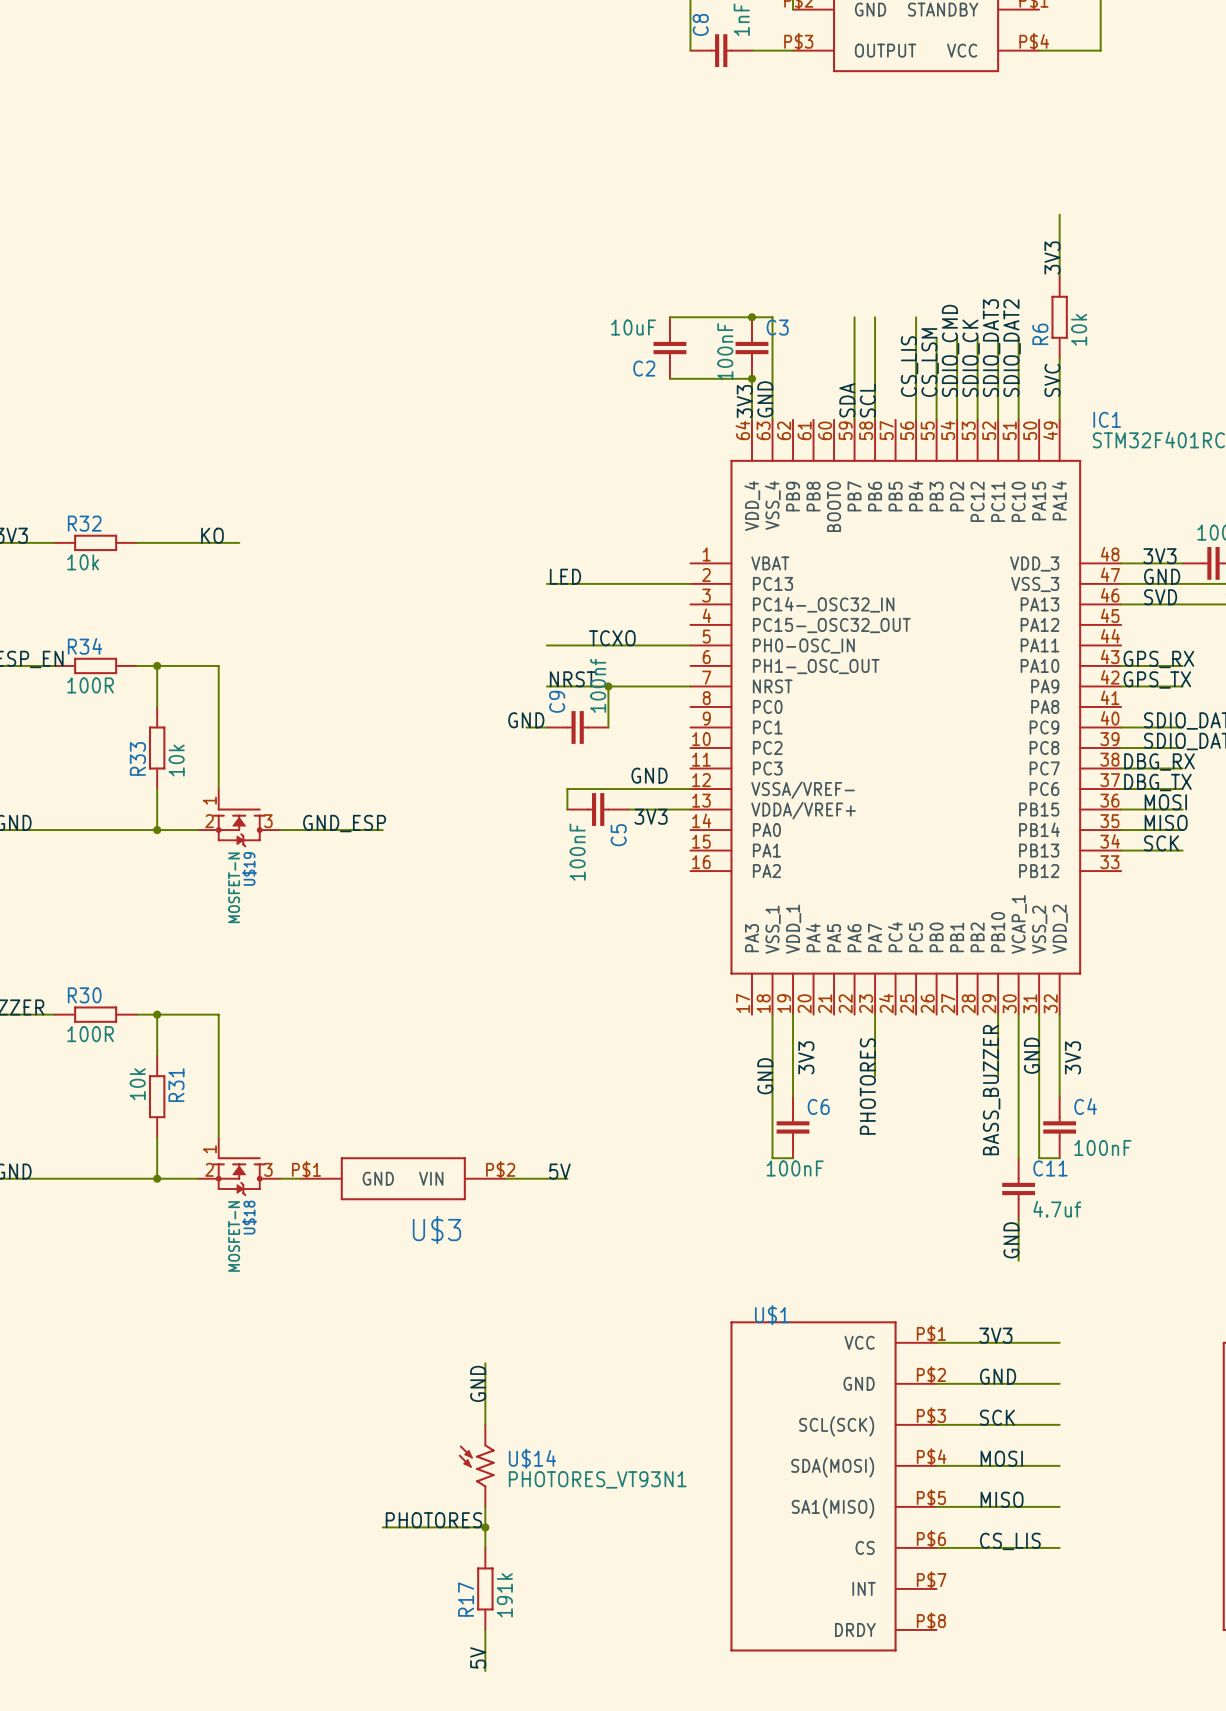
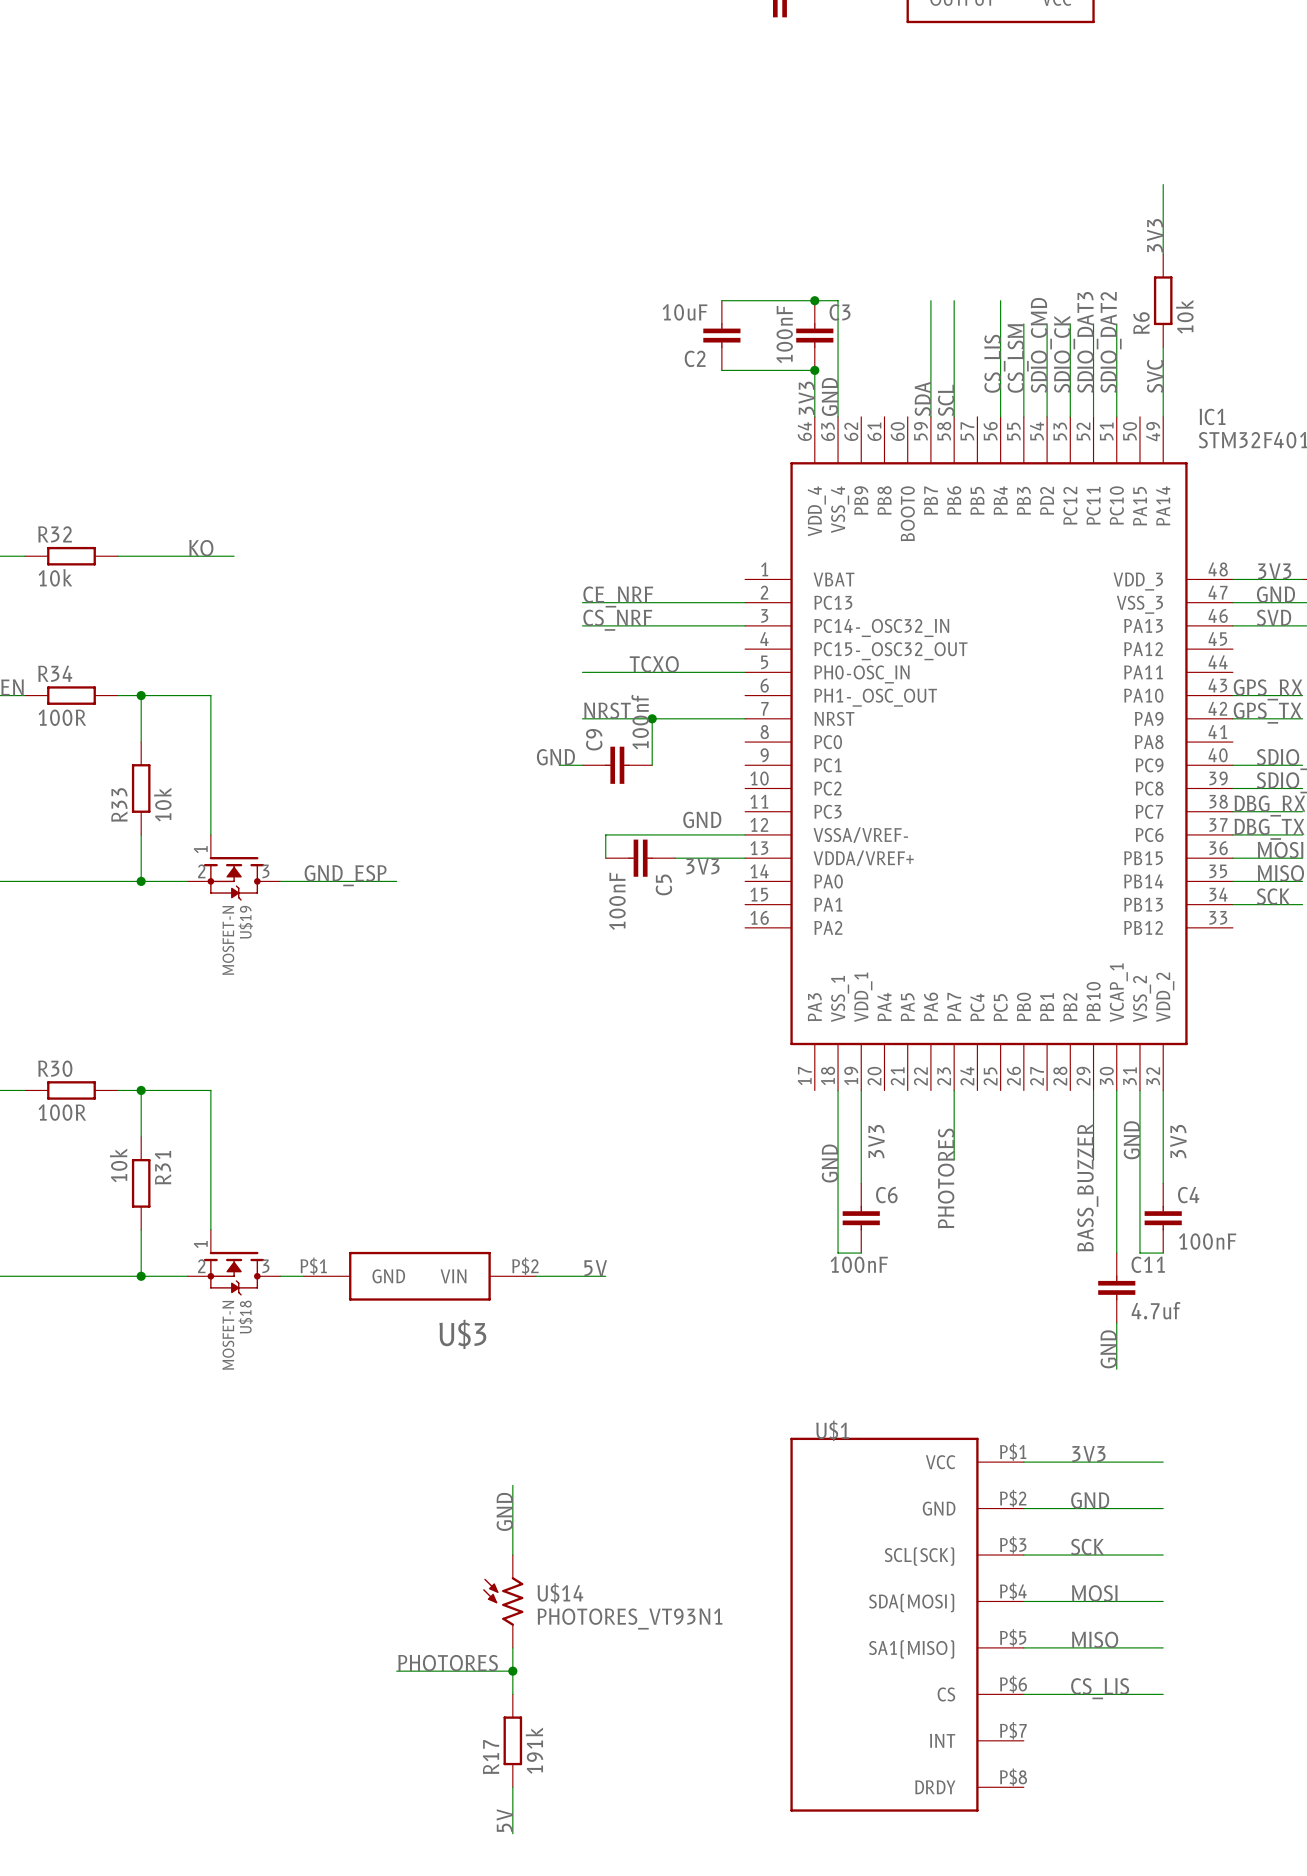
label: LED (565, 576) -> CE_NRF (618, 596)
label: none -> CS_NRF (617, 620)
wire: none -> (582, 625) (745, 625)

